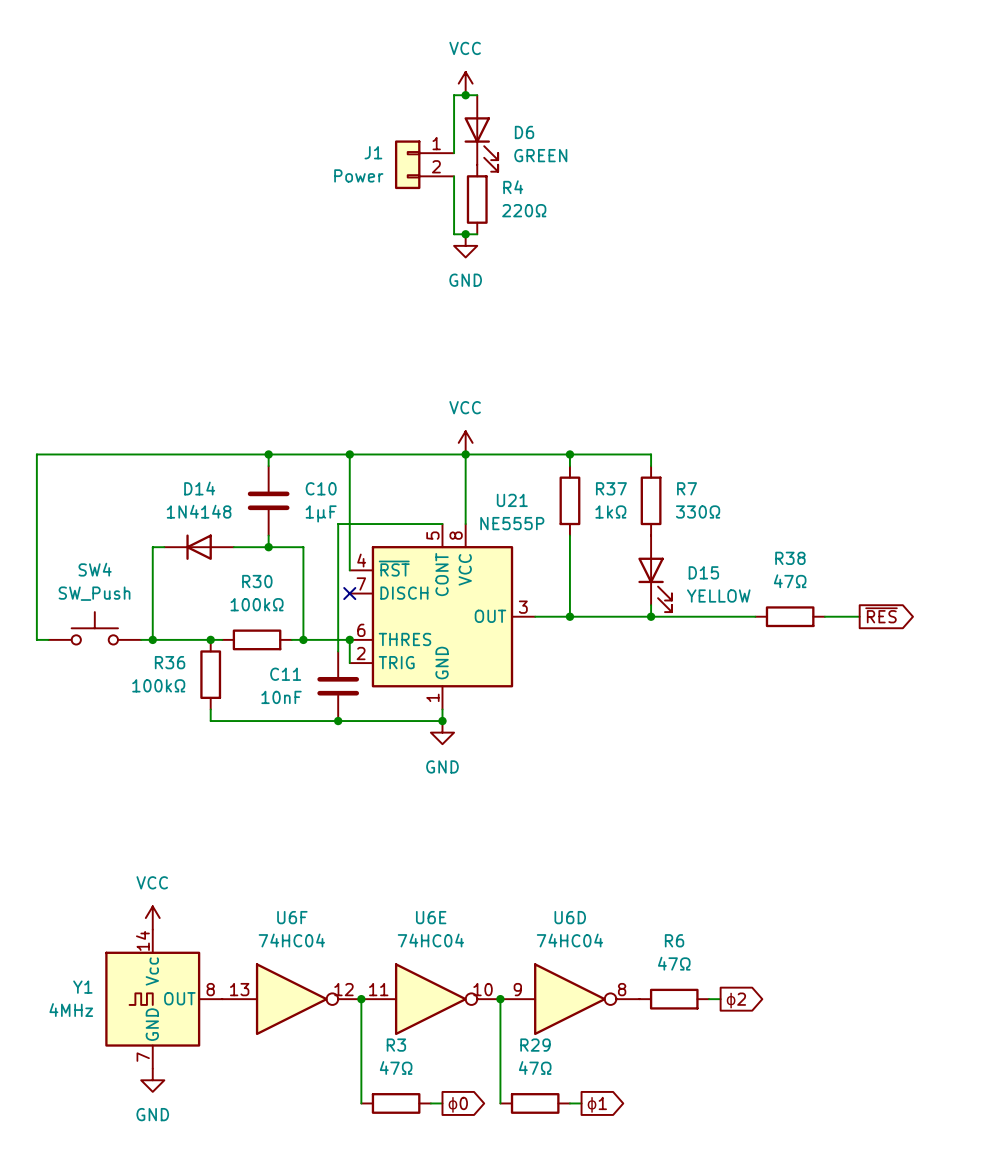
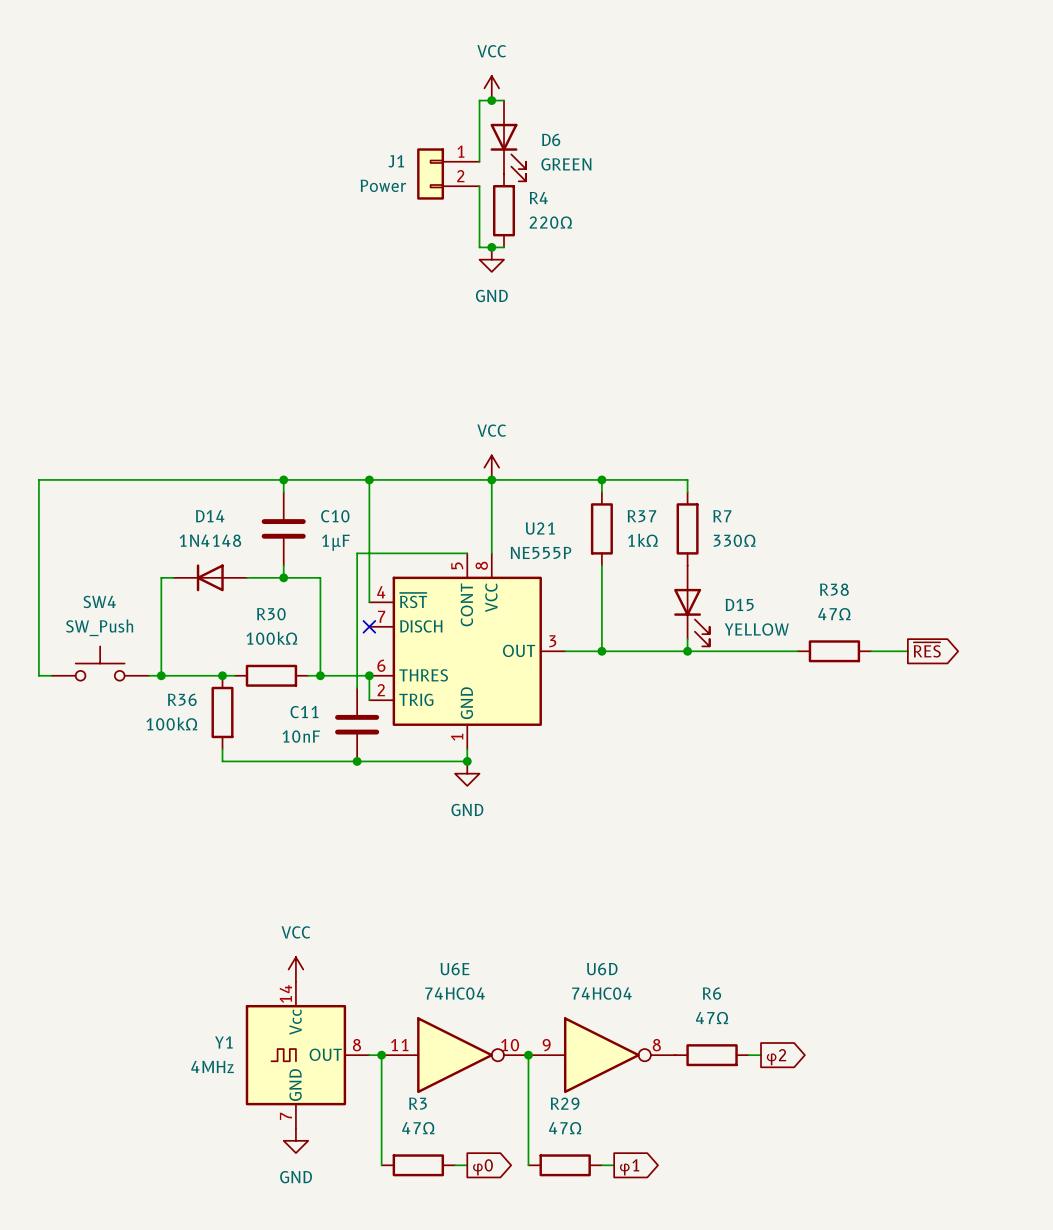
power symbol position: VCC (152, 918) -> VCC (295, 969)
Y1 position: (163, 999) -> (307, 1055)
U6F: 74HC04 (291, 999) -> none
power symbol position: GND (152, 1080) -> GND (295, 1140)

